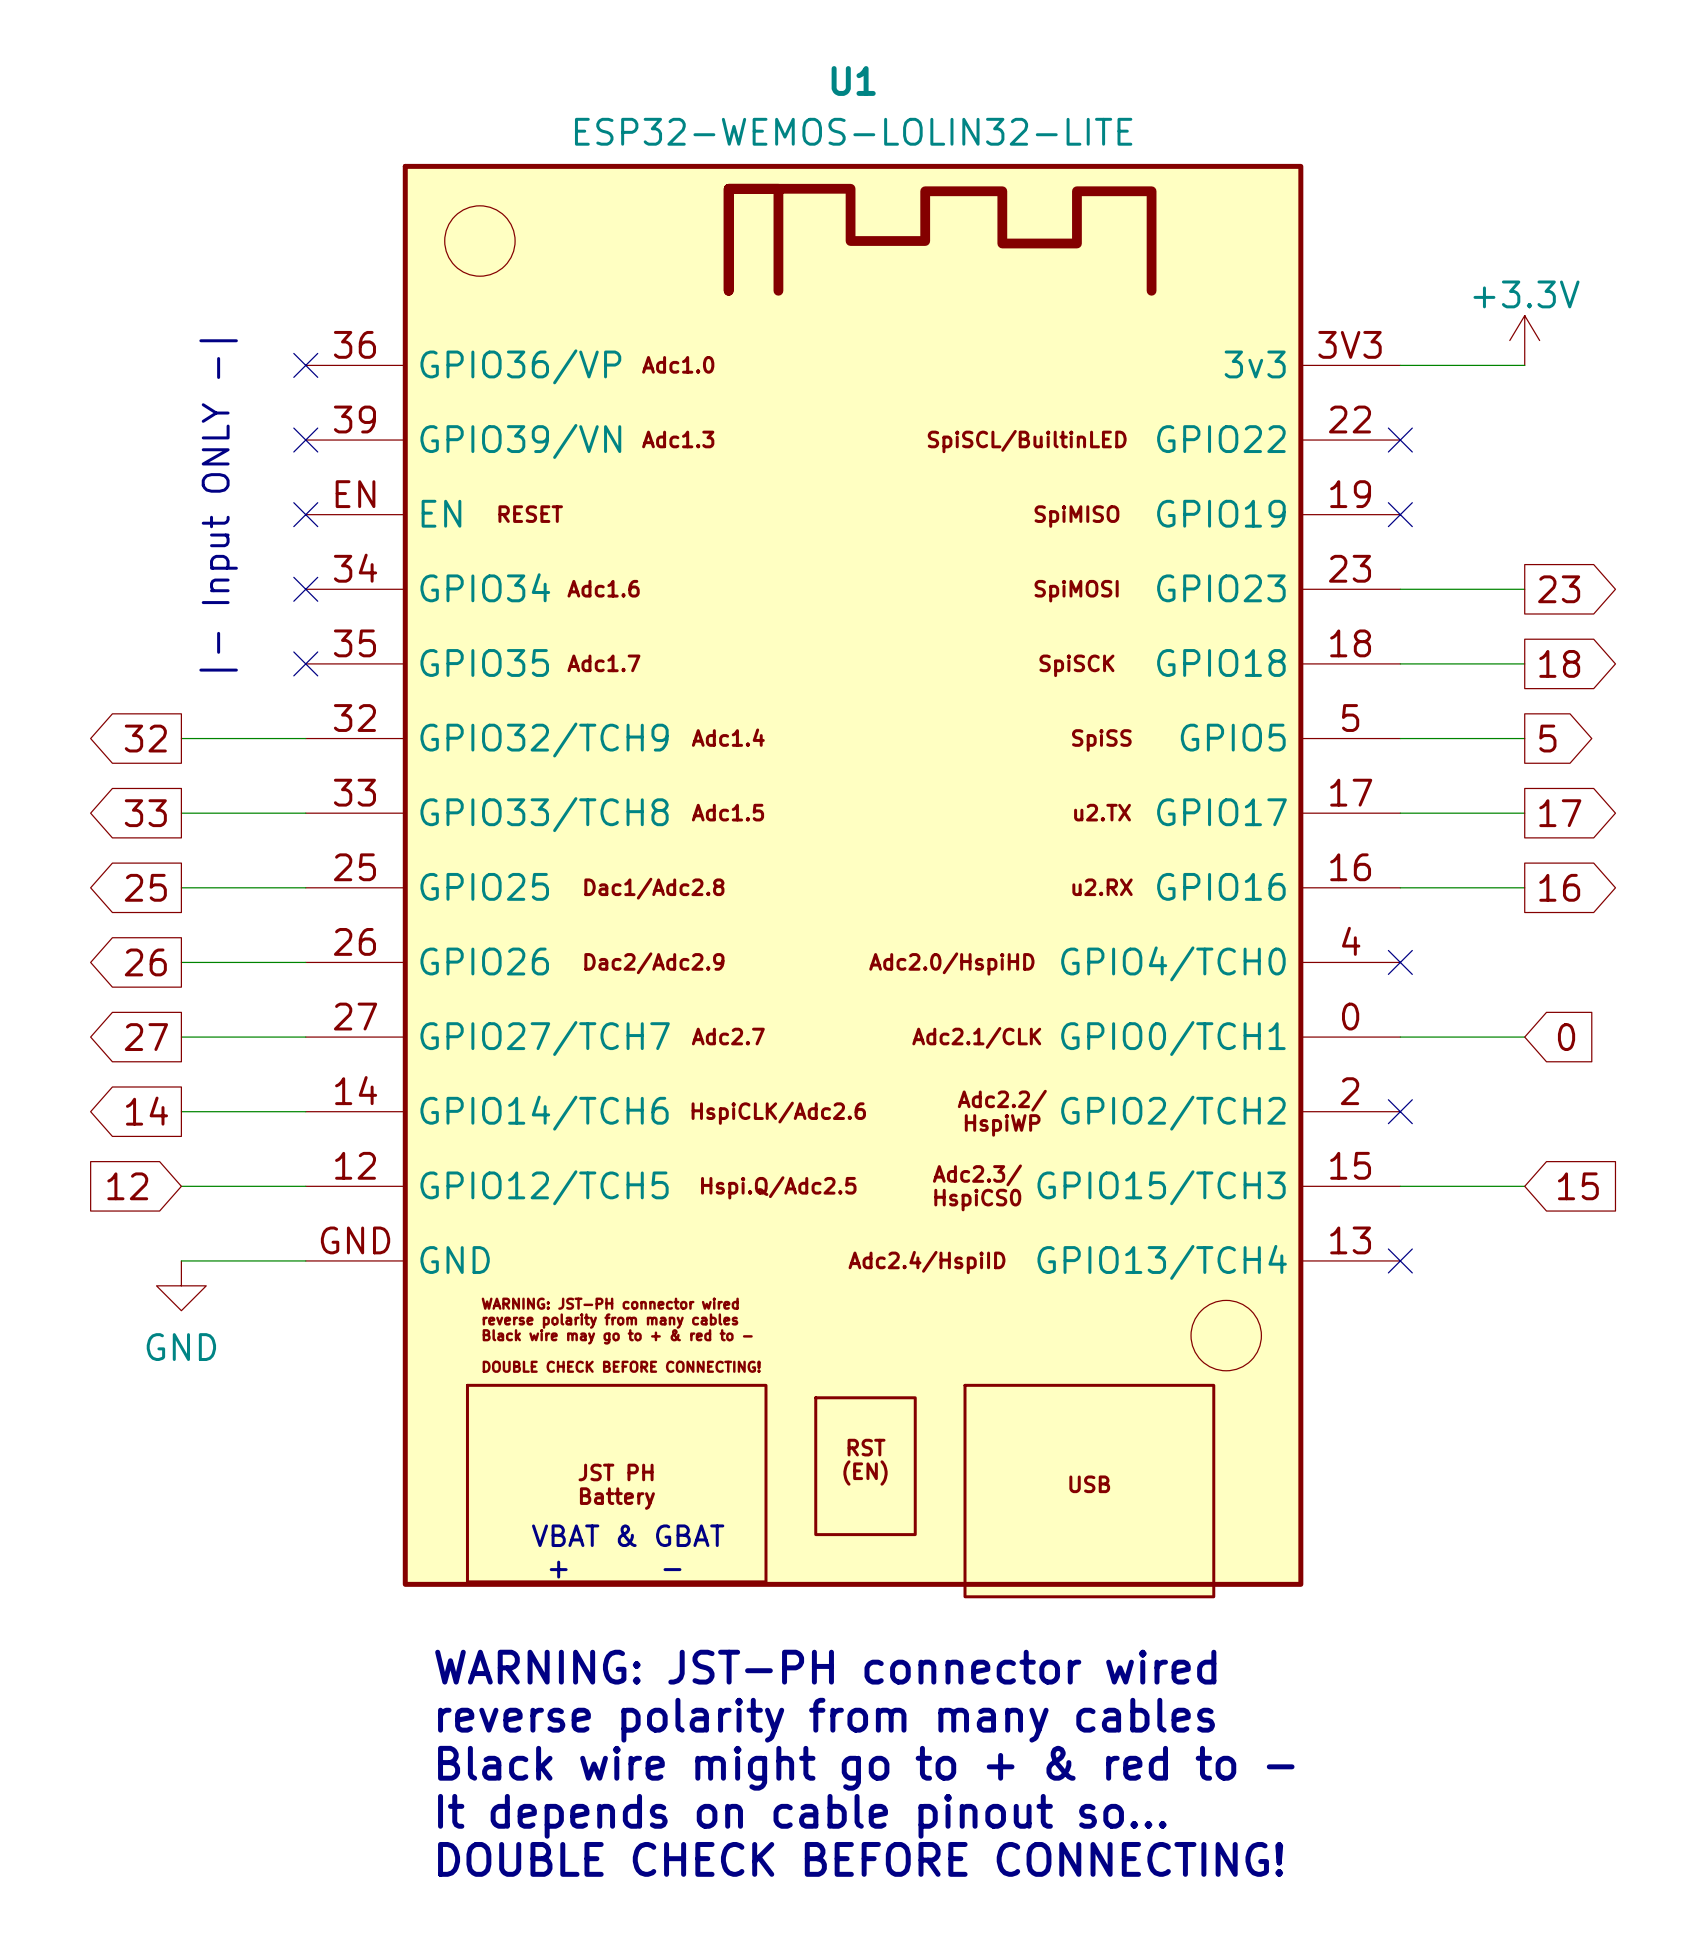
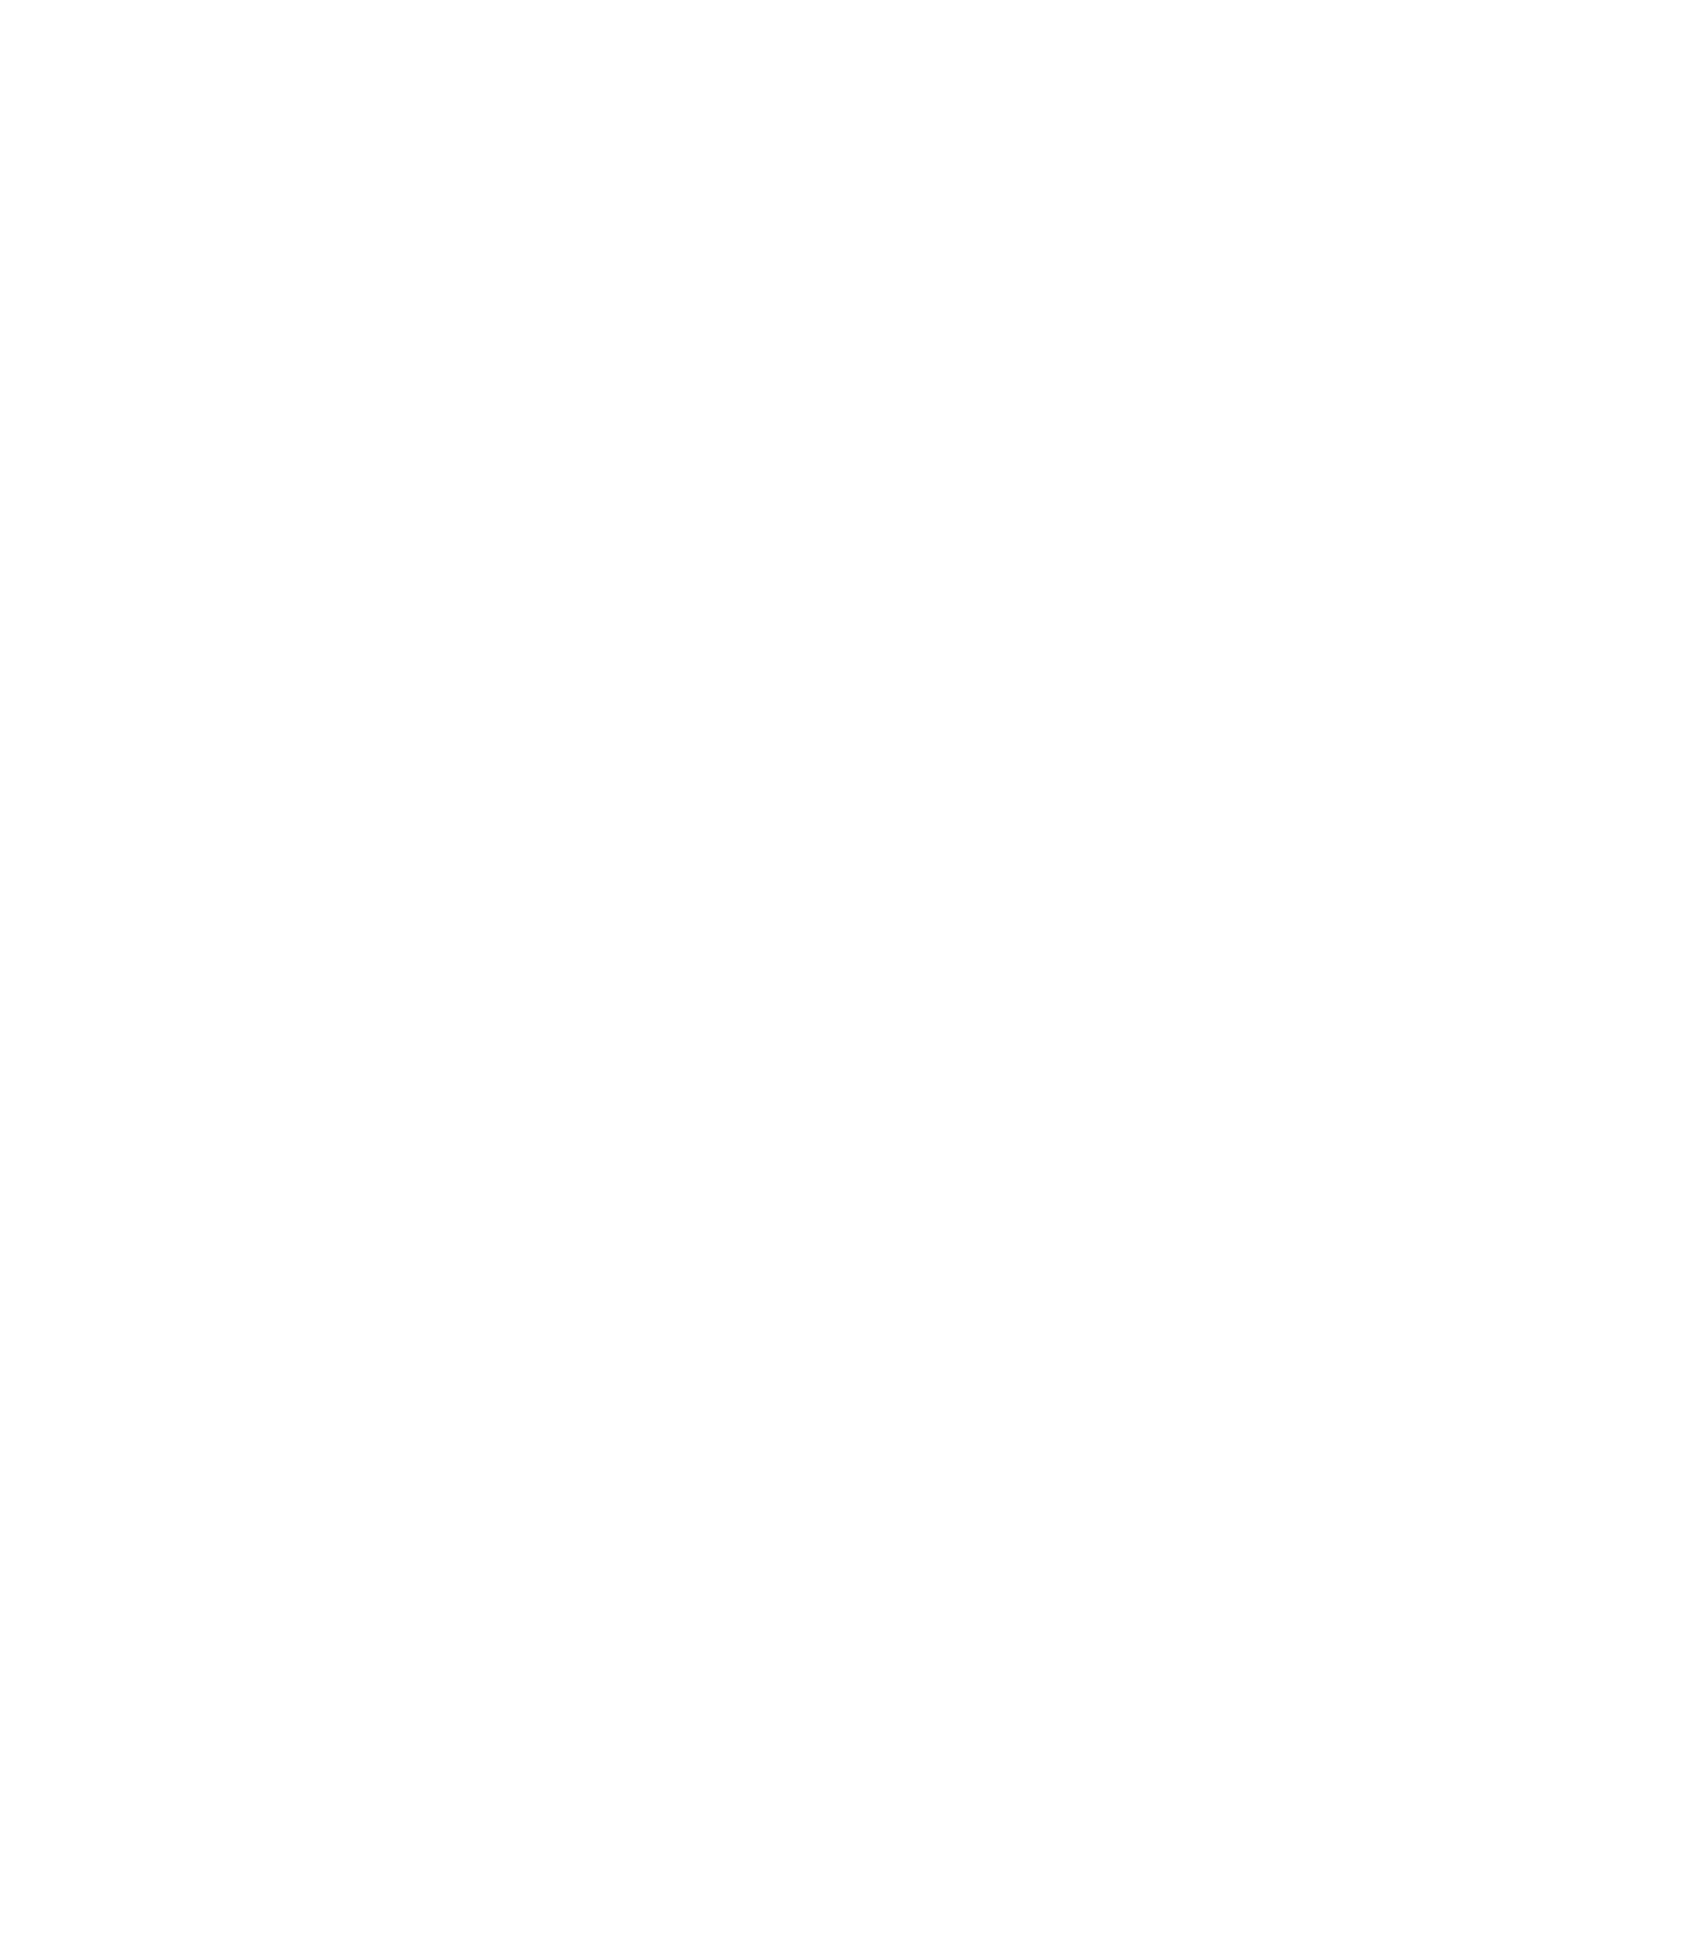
power symbol: +3.3V (1524, 340) -> none
no-connect mark: (305, 365) -> none
wire: (1400, 365) (1524, 365) -> none
no-connect mark: (305, 440) -> none
no-connect mark: (1400, 440) -> none
text: |- Input ONLY -| (218, 505) -> none
no-connect mark: (305, 514) -> none
no-connect mark: (1400, 514) -> none
no-connect mark: (305, 589) -> none
wire: (1400, 589) (1524, 589) -> none
global label: 23 (1559, 589) -> none
no-connect mark: (305, 663) -> none
wire: (1400, 663) (1524, 663) -> none
global label: 18 (1559, 663) -> none
global label: 32 (145, 738) -> none
wire: (181, 738) (305, 738) -> none
wire: (1400, 738) (1524, 738) -> none
global label: 5 (1547, 738) -> none
global label: 33 (145, 813) -> none
wire: (181, 813) (305, 813) -> none
wire: (1400, 813) (1524, 813) -> none
global label: 17 (1560, 813) -> none
U1: ESP32-WEMOS-LOLIN32-LITE (853, 881) -> none
global label: 25 (145, 887) -> none
wire: (181, 887) (305, 887) -> none
wire: (1400, 887) (1524, 887) -> none
global label: 16 (1559, 887) -> none
global label: 26 (145, 962) -> none
wire: (181, 962) (305, 962) -> none
no-connect mark: (1400, 962) -> none
global label: 27 (146, 1037) -> none
wire: (181, 1037) (305, 1037) -> none
wire: (1400, 1037) (1524, 1037) -> none
global label: 0 (1566, 1037) -> none
global label: 14 (146, 1111) -> none
wire: (181, 1111) (305, 1111) -> none
no-connect mark: (1400, 1111) -> none
global label: 12 (127, 1186) -> none
wire: (181, 1186) (305, 1186) -> none
wire: (1400, 1186) (1524, 1186) -> none
global label: 15 (1578, 1186) -> none
wire: (181, 1260) (305, 1260) -> none
no-connect mark: (1400, 1260) -> none
power symbol: GND (181, 1285) -> none
text: VBAT & GBAT (628, 1535) -> none
text: + - (615, 1569) -> none
text: WARNING: JST-PH connector wired (825, 1667) -> none
text: reverse polarity from many cables (826, 1720) -> none
text: Black wire might go to + & red to - (866, 1768) -> none
text: It depends on cable pinout so... (802, 1816) -> none
text: DOUBLE CHECK BEFORE CONNECTING! (860, 1859) -> none

